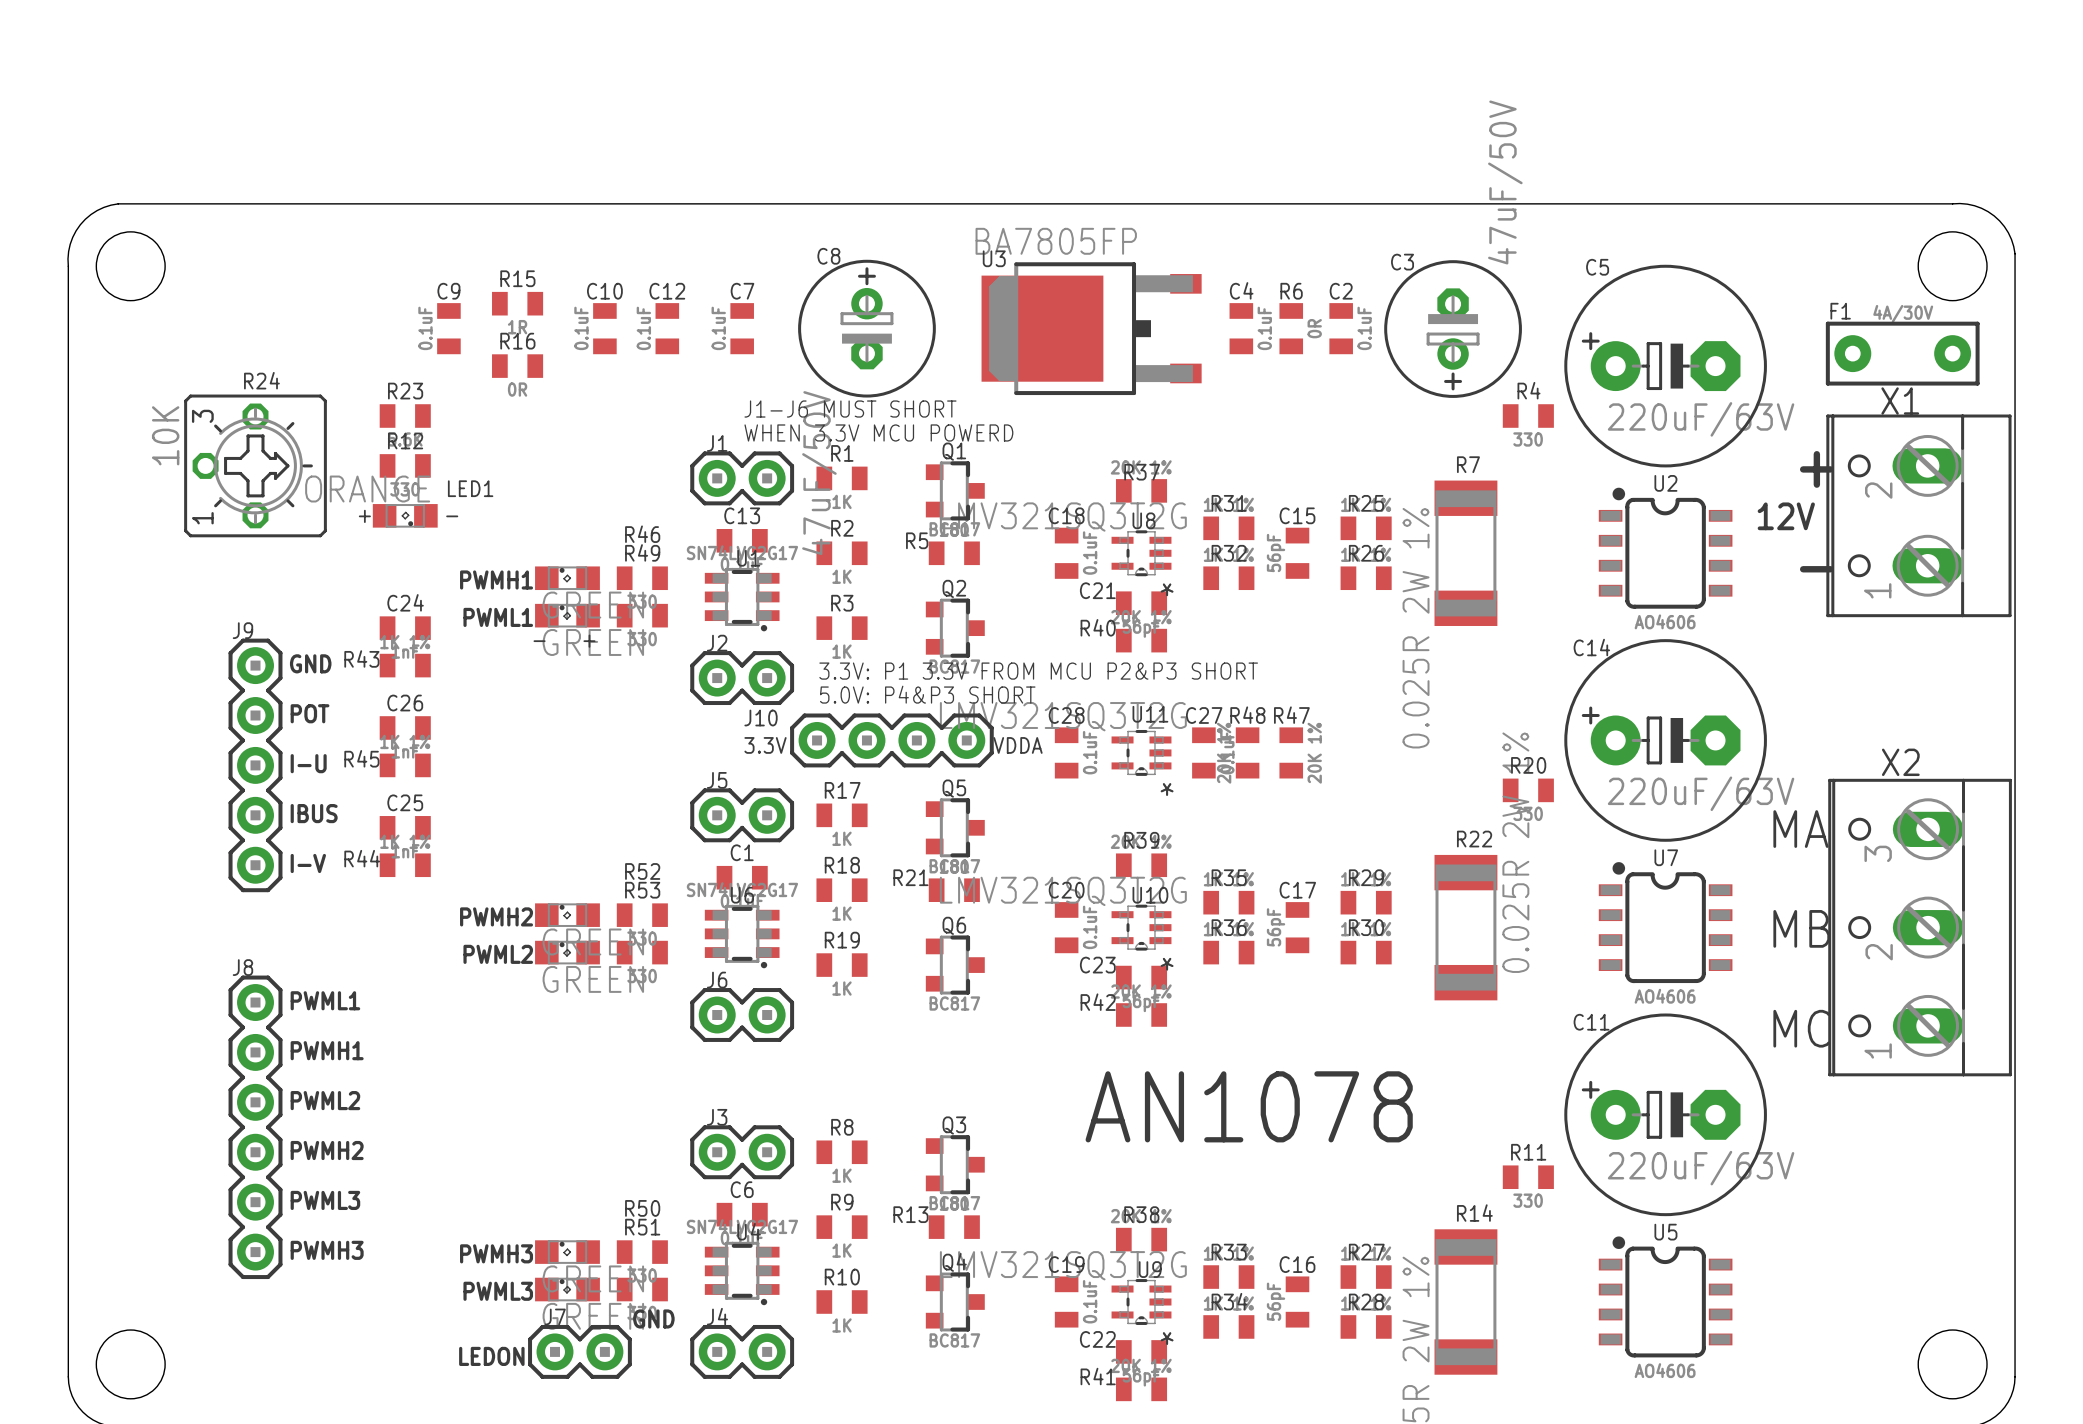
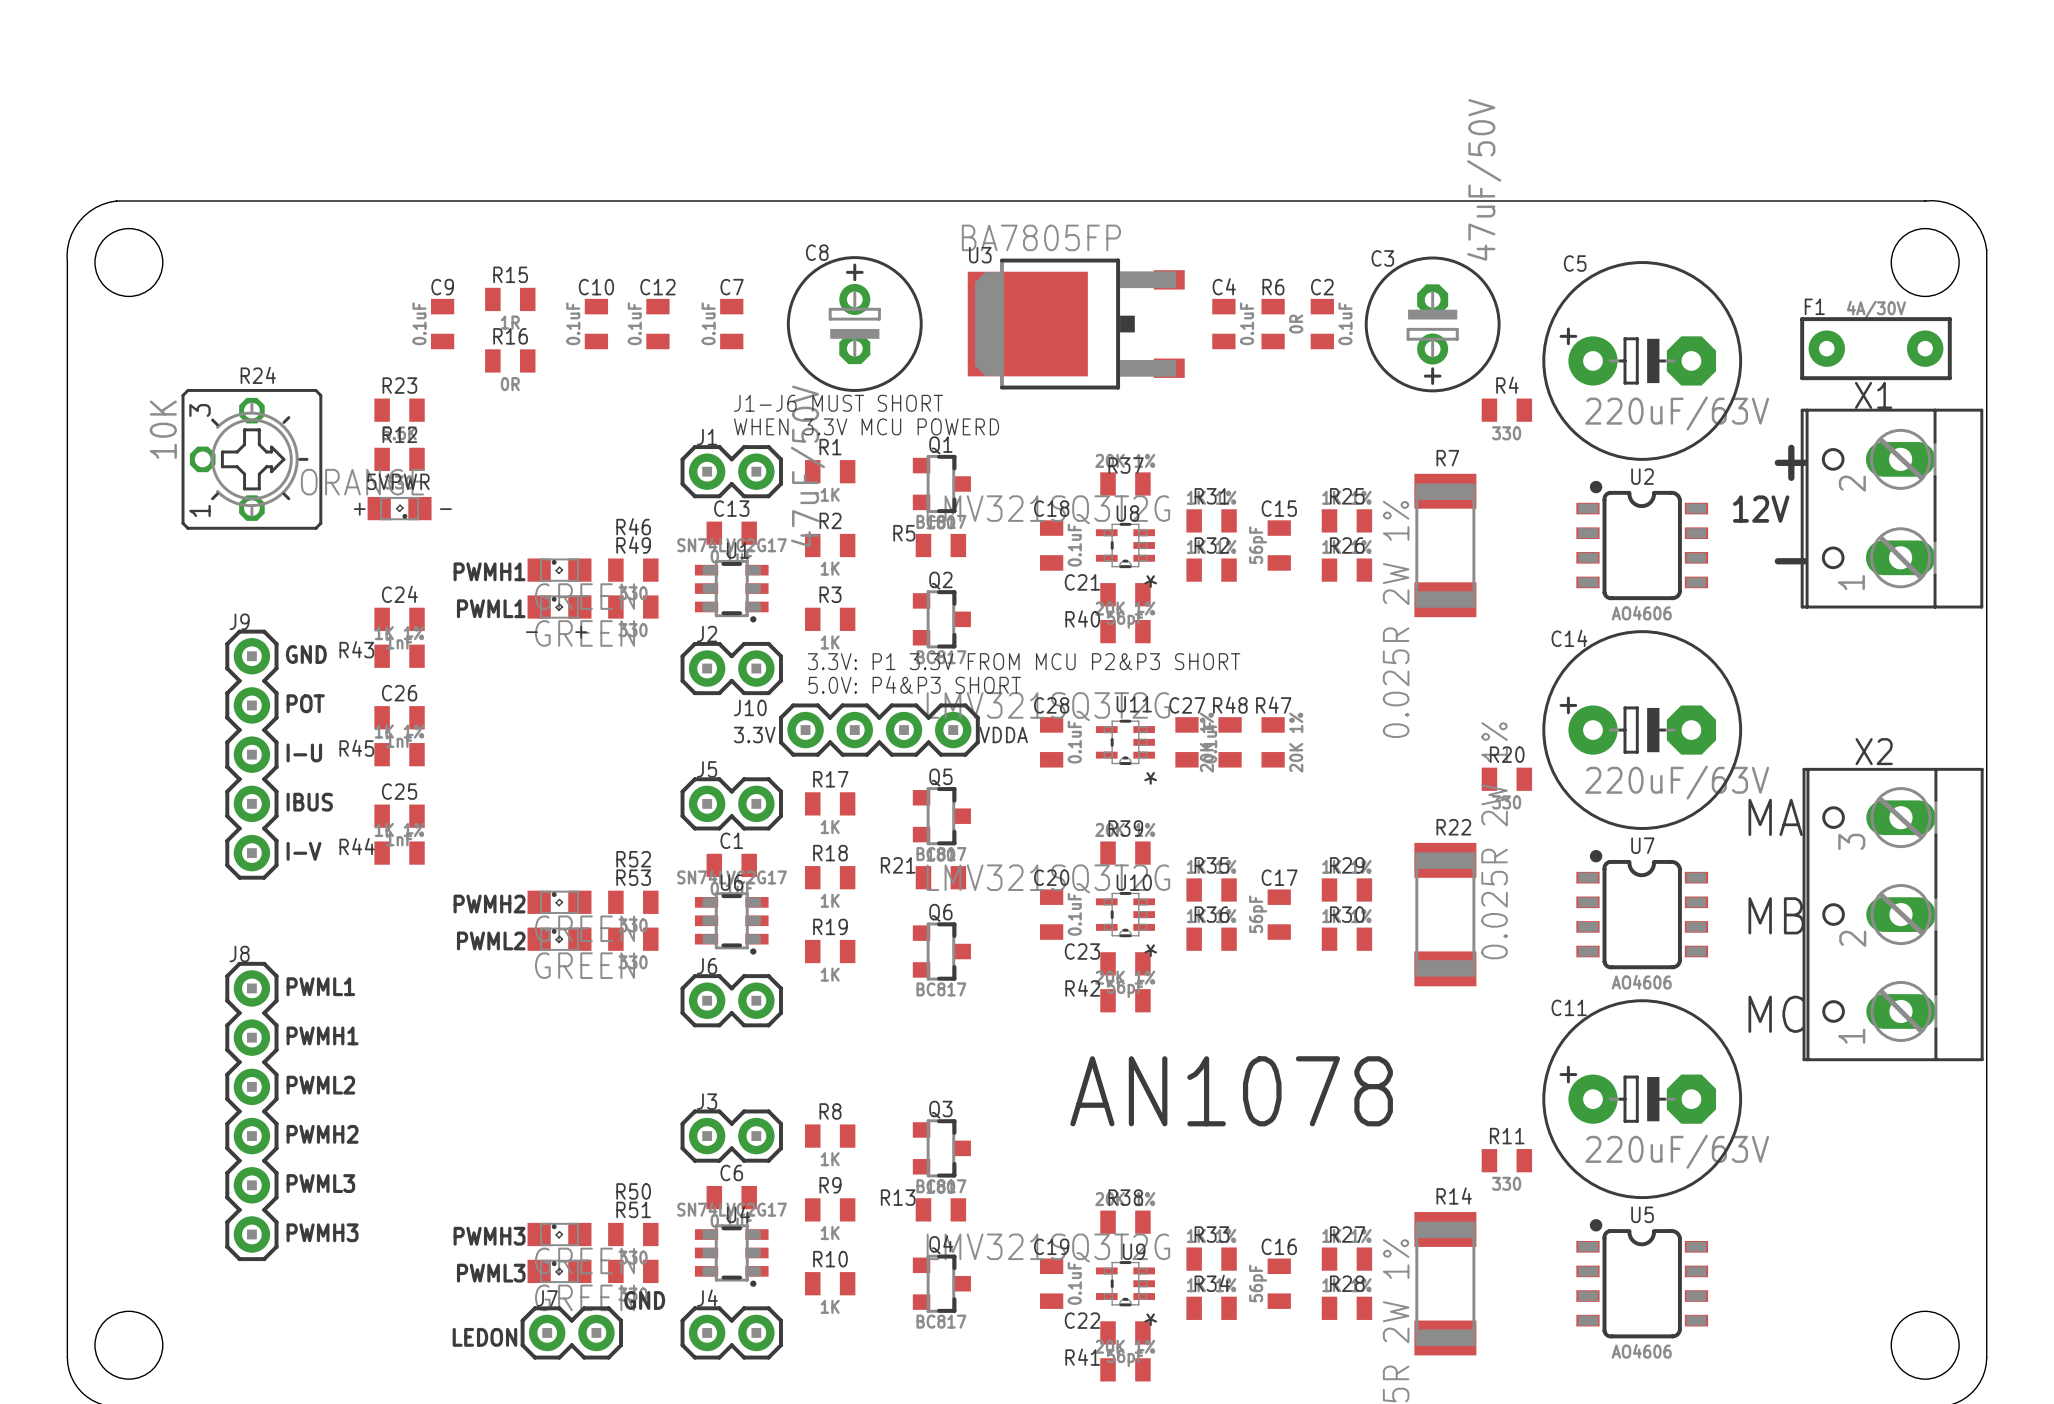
LED1 name: LED1 (470, 488) -> 5VPWR (398, 481)

